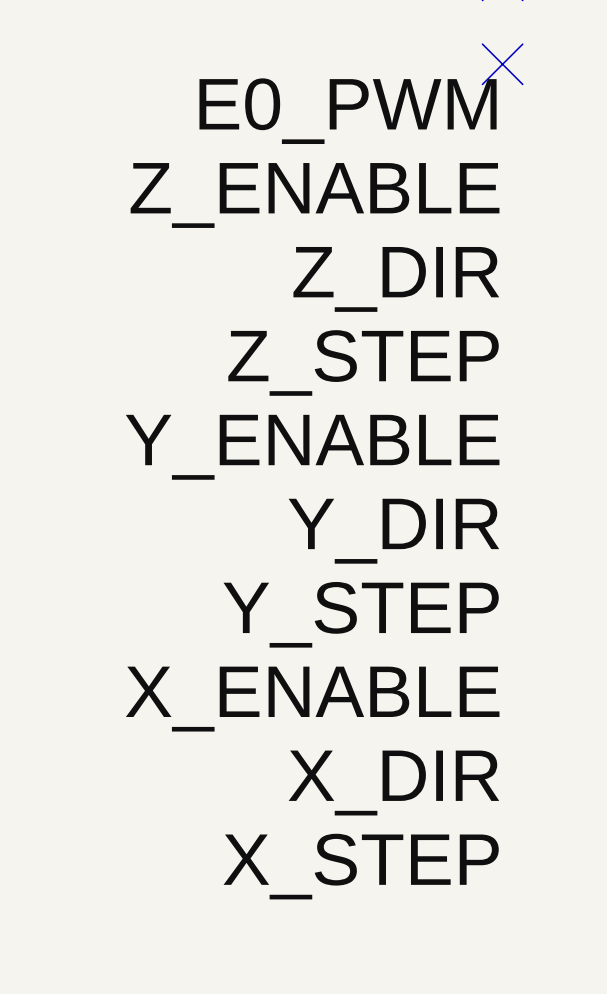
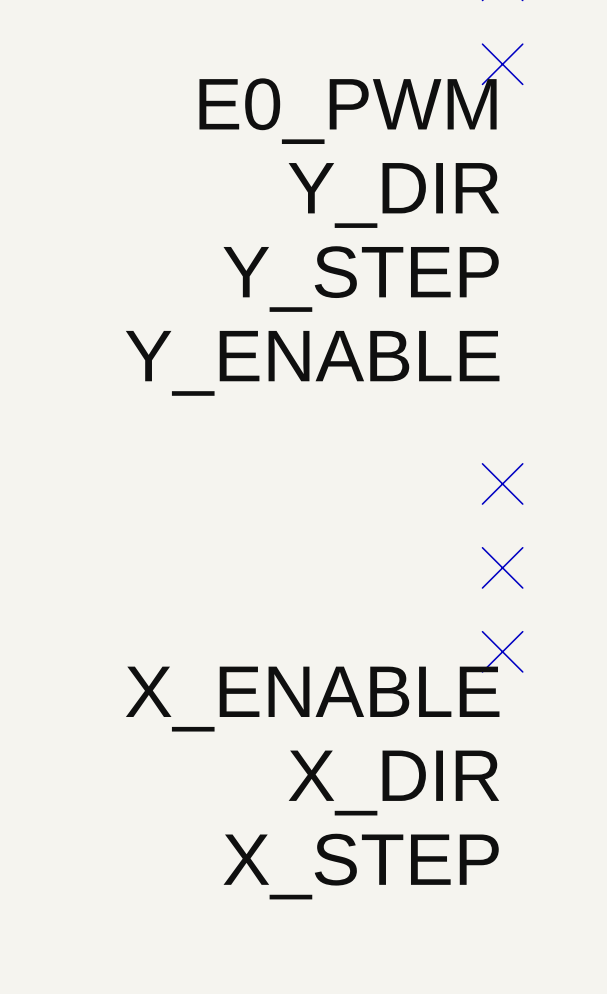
label: Z_ENABLE (315, 195) -> Y_DIR (393, 195)
label: Z_DIR (396, 279) -> Y_STEP (361, 279)
label: Z_STEP (363, 362) -> Y_ENABLE (312, 363)
label: Y_ENABLE (312, 447) -> none
no-connect mark: none -> (502, 483)
label: Y_DIR (393, 531) -> none
no-connect mark: none -> (502, 567)
label: Y_STEP (361, 614) -> none
no-connect mark: none -> (502, 651)

